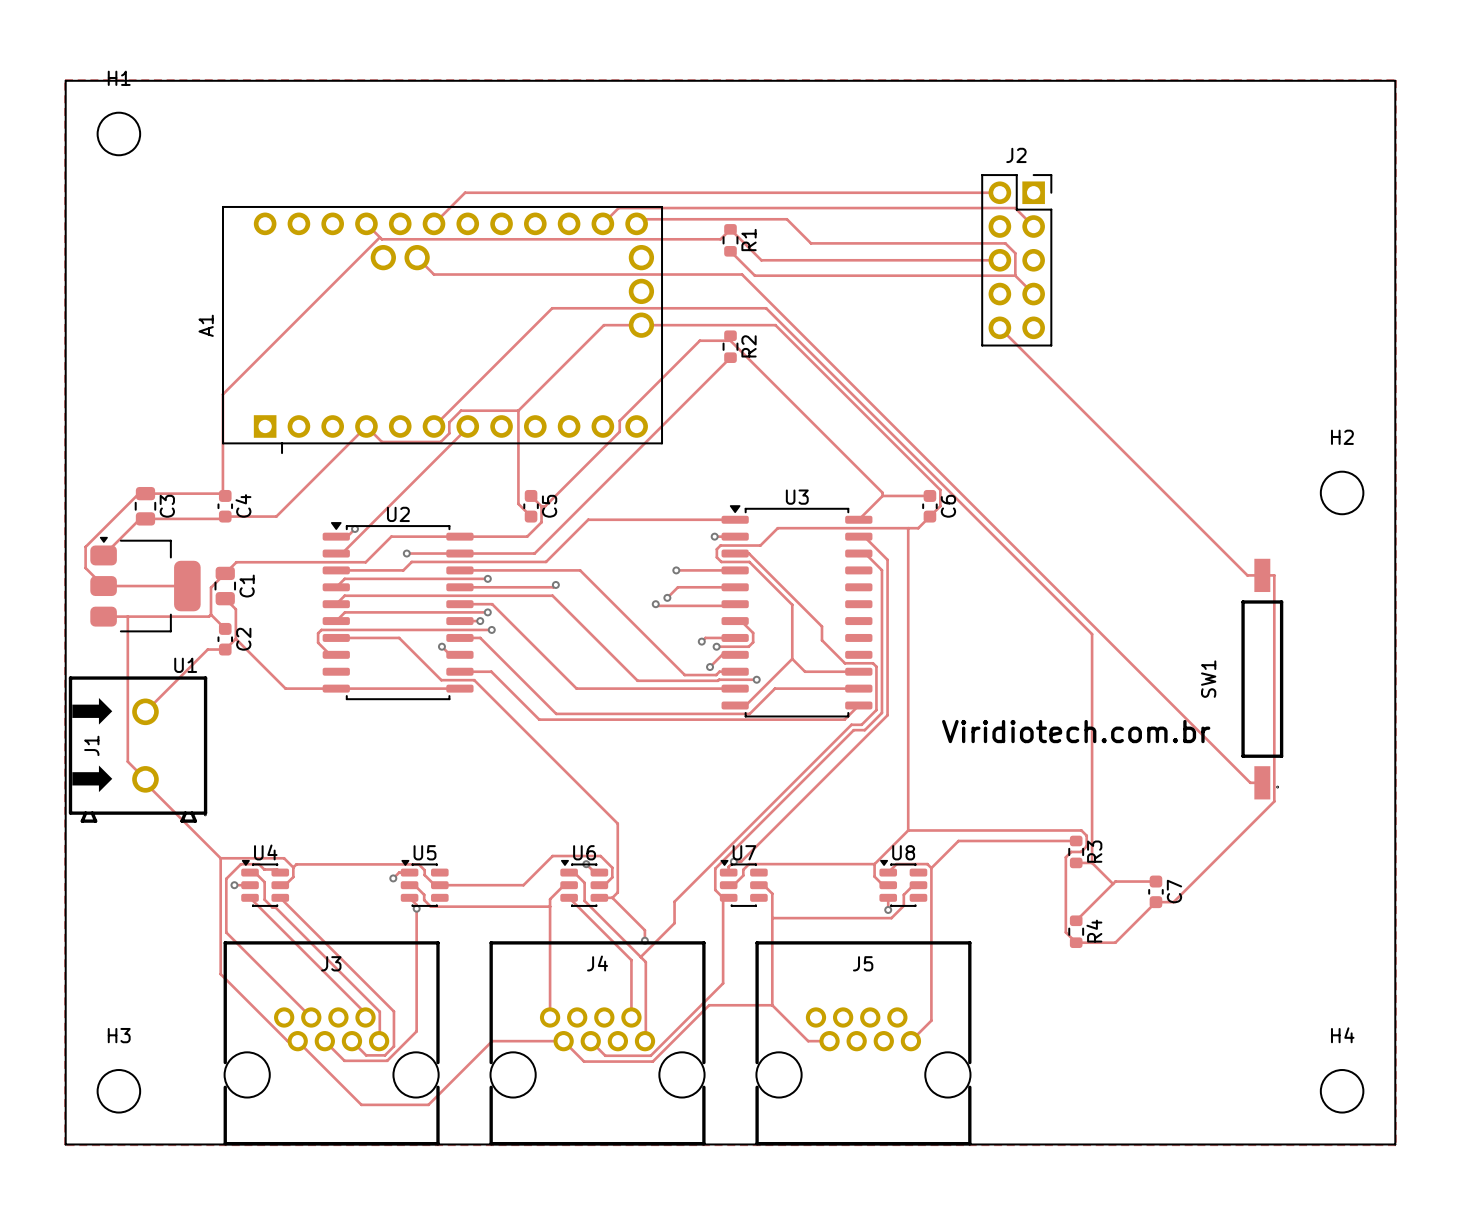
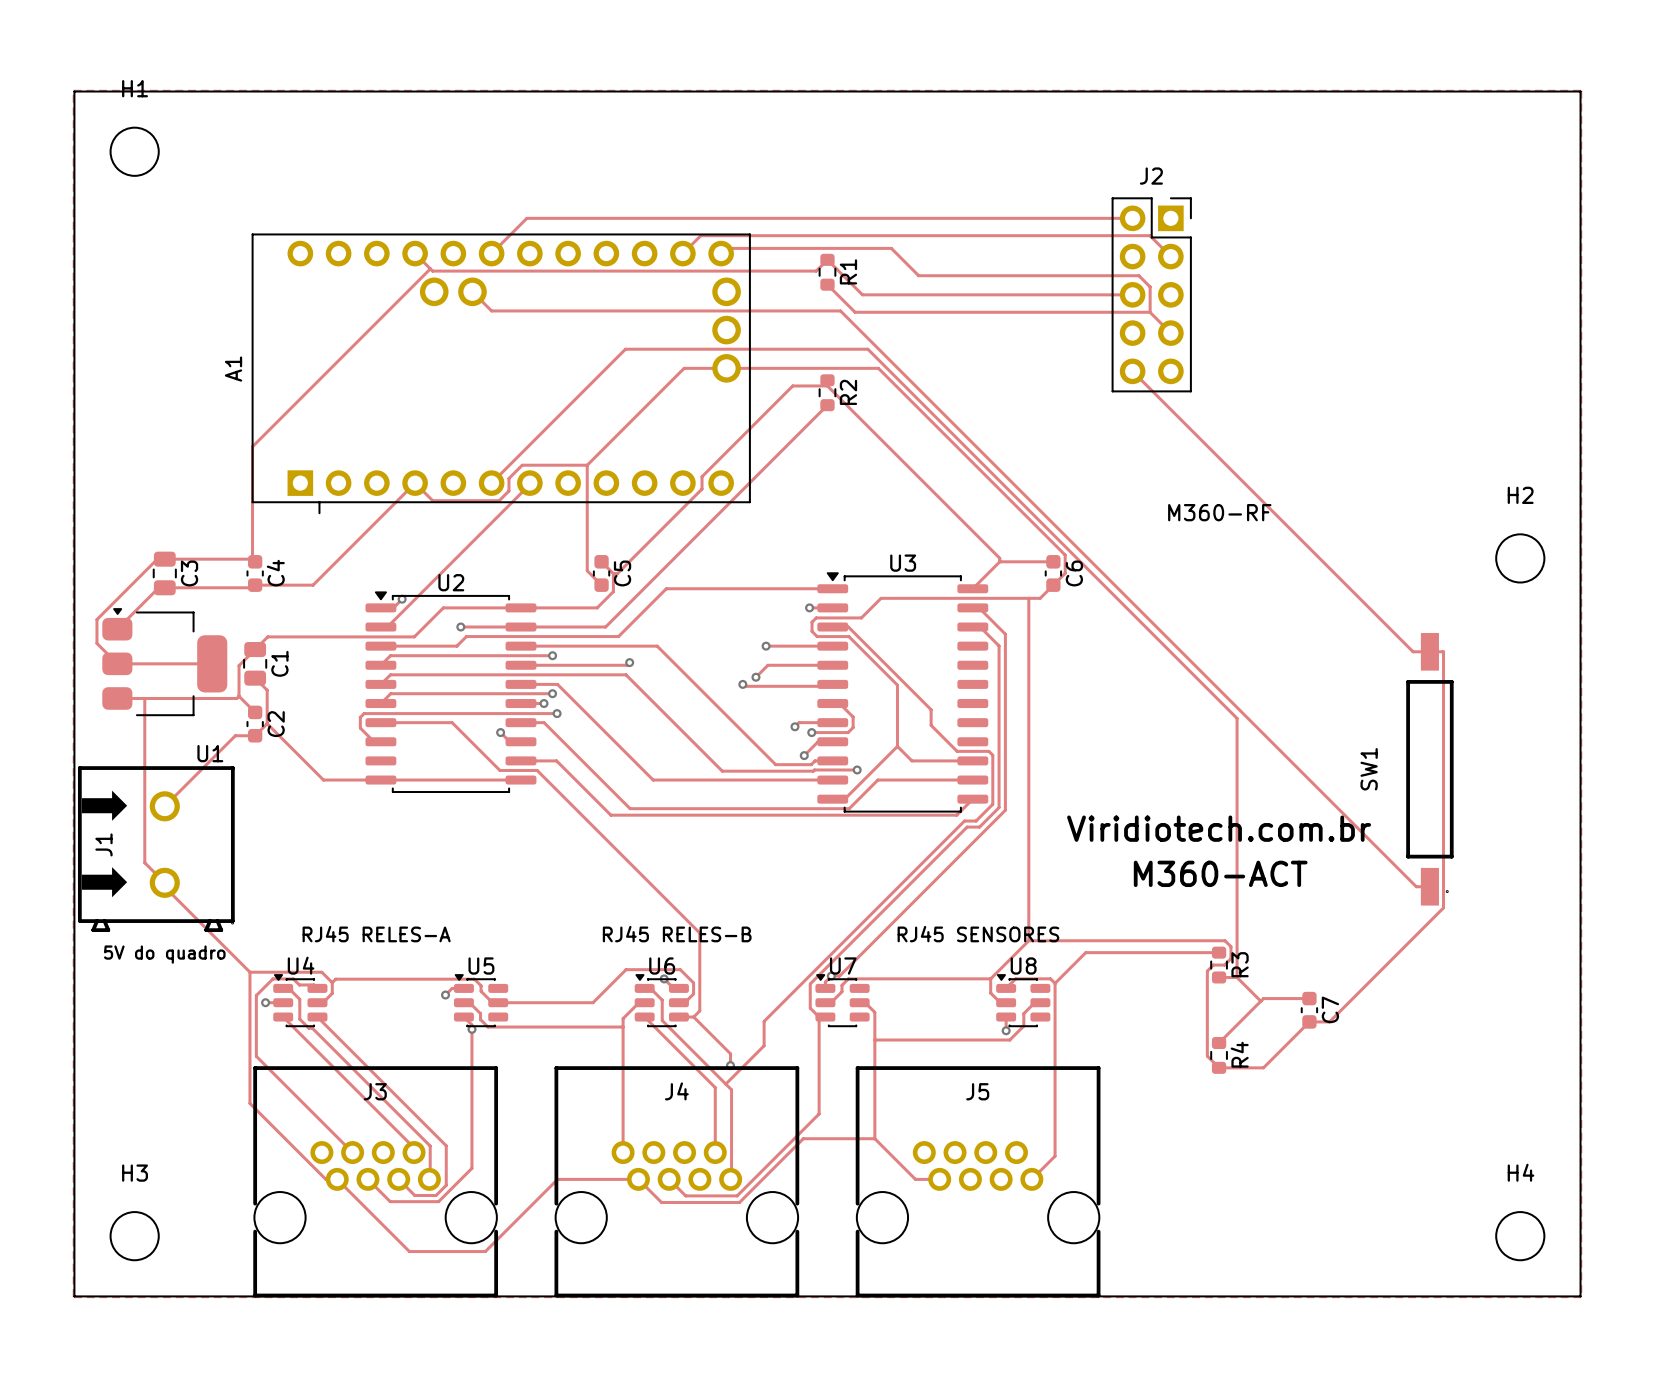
J2 value: none -> M360-RF (1219, 512)
text: none -> M360-ACT (1220, 873)
J3 value: none -> RJ45 RELES-A (376, 934)
J4 value: none -> RJ45 RELES-B (677, 934)
J5 value: none -> RJ45 SENSORES (978, 934)
J1 value: none -> 5V do quadro (164, 954)

